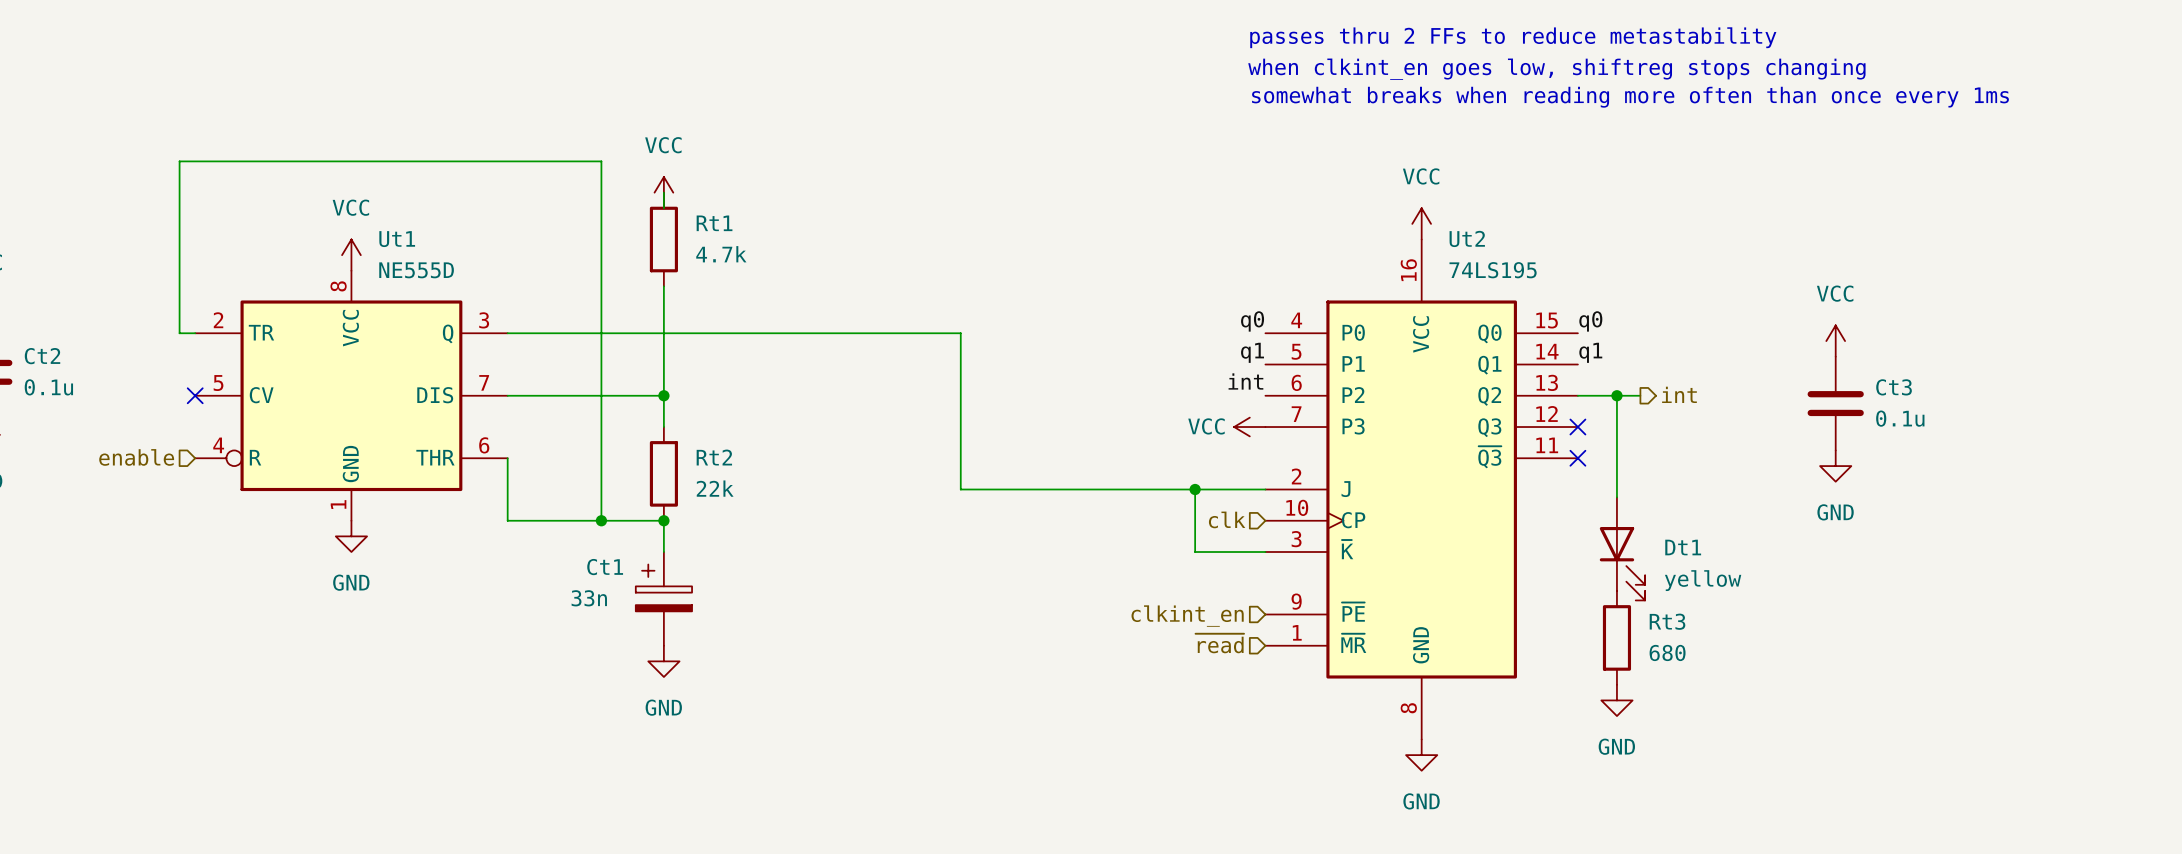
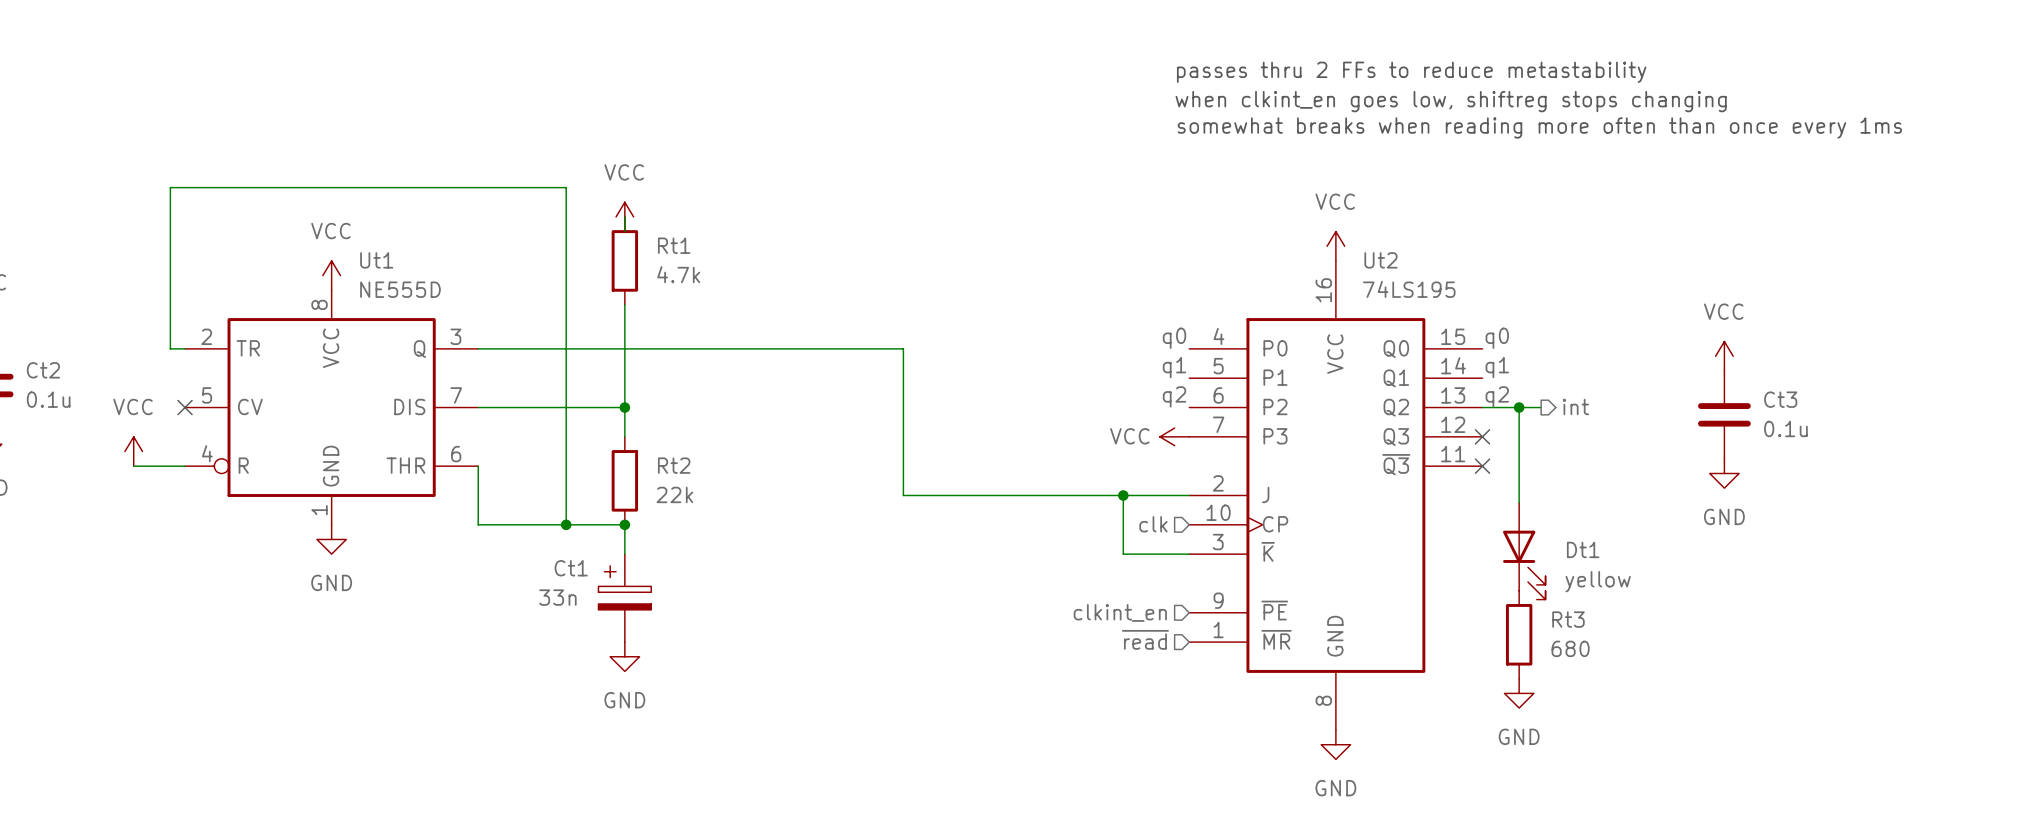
label: int (1245, 381) -> q2 (1174, 396)
label: none -> q2 (1497, 396)
power symbol: none -> VCC (133, 451)
hierarchical label: enable (136, 457) -> none
wire: none -> (133, 466) (185, 466)

